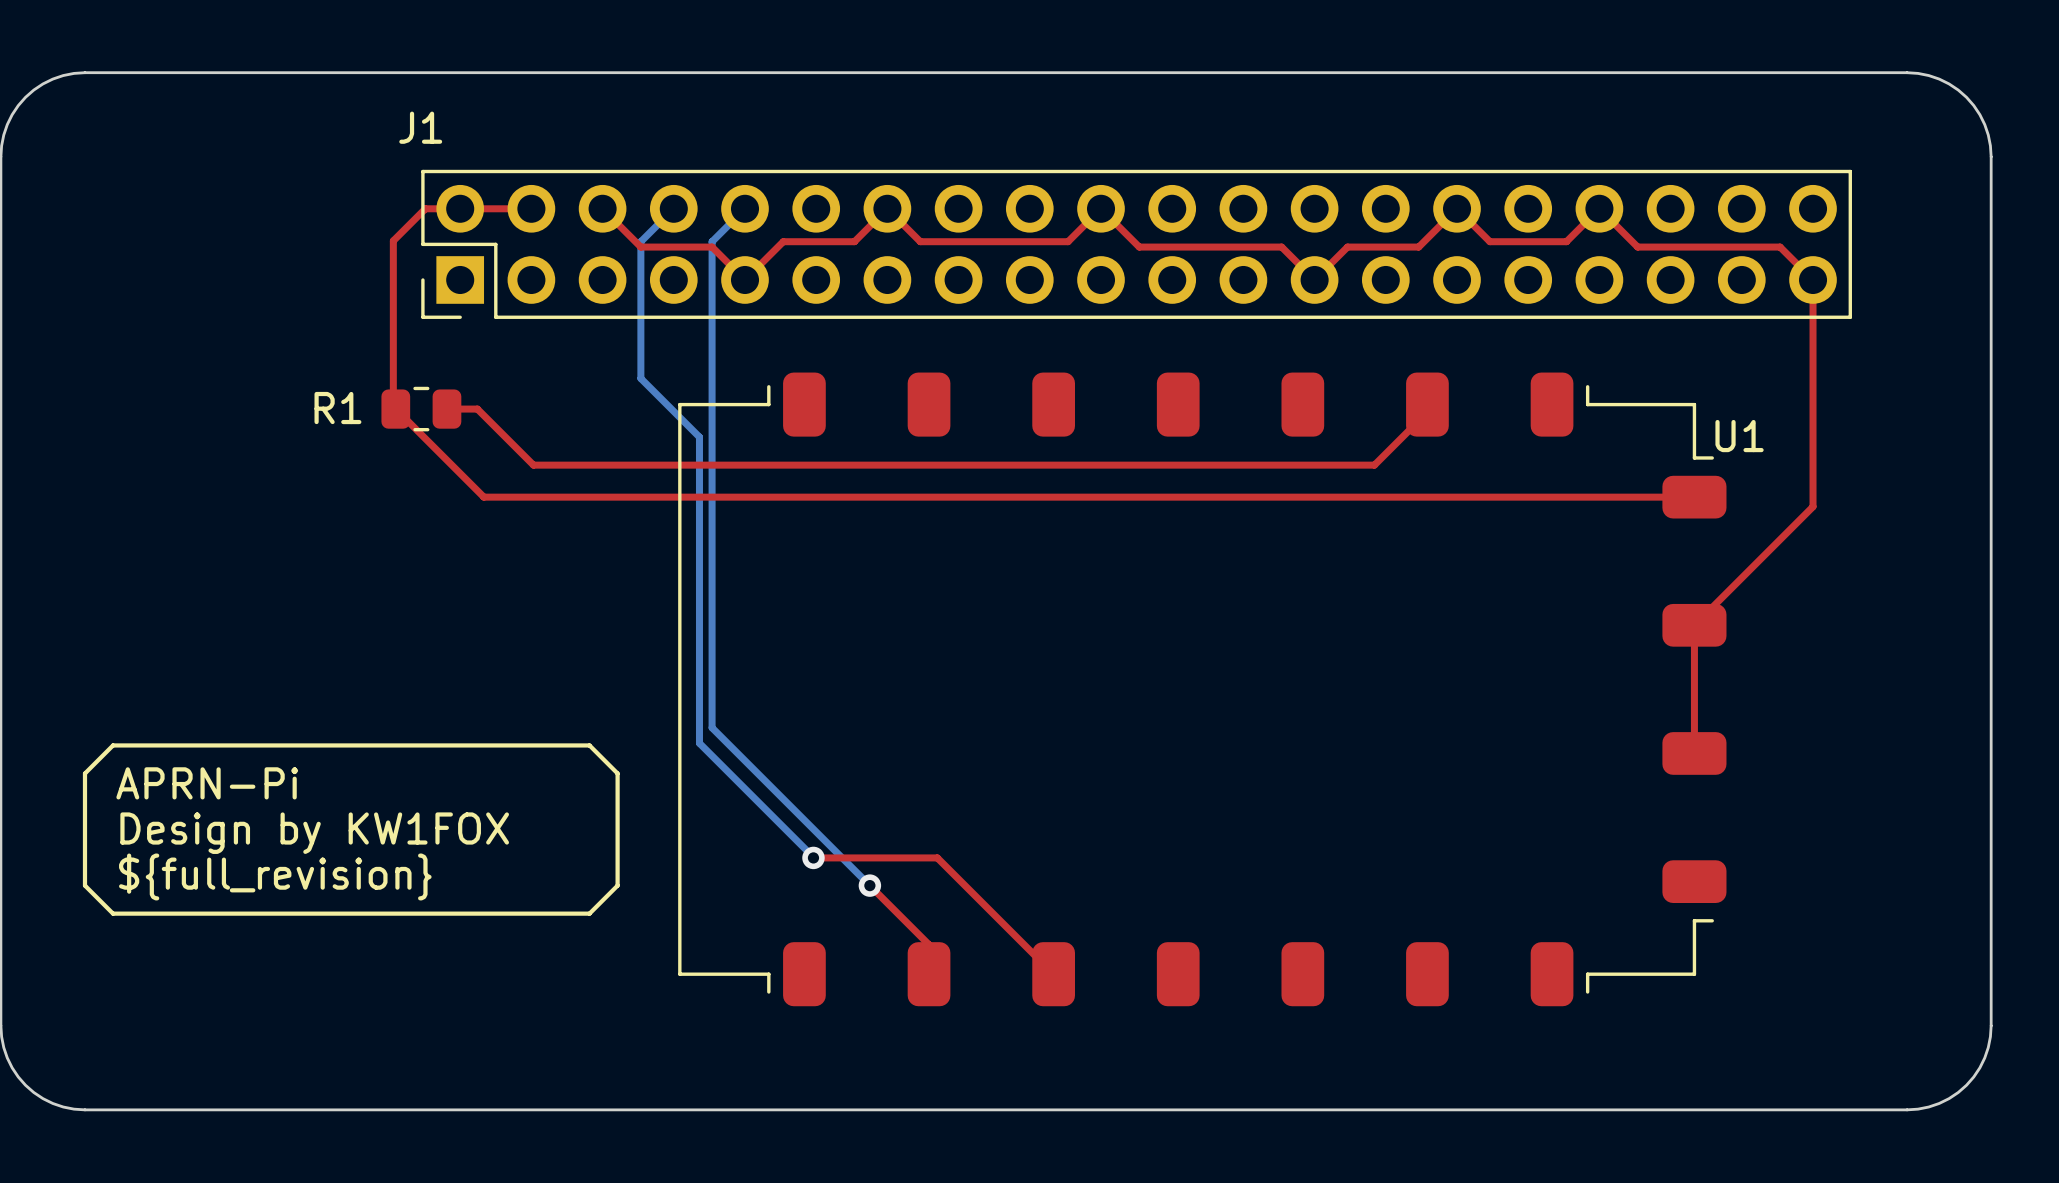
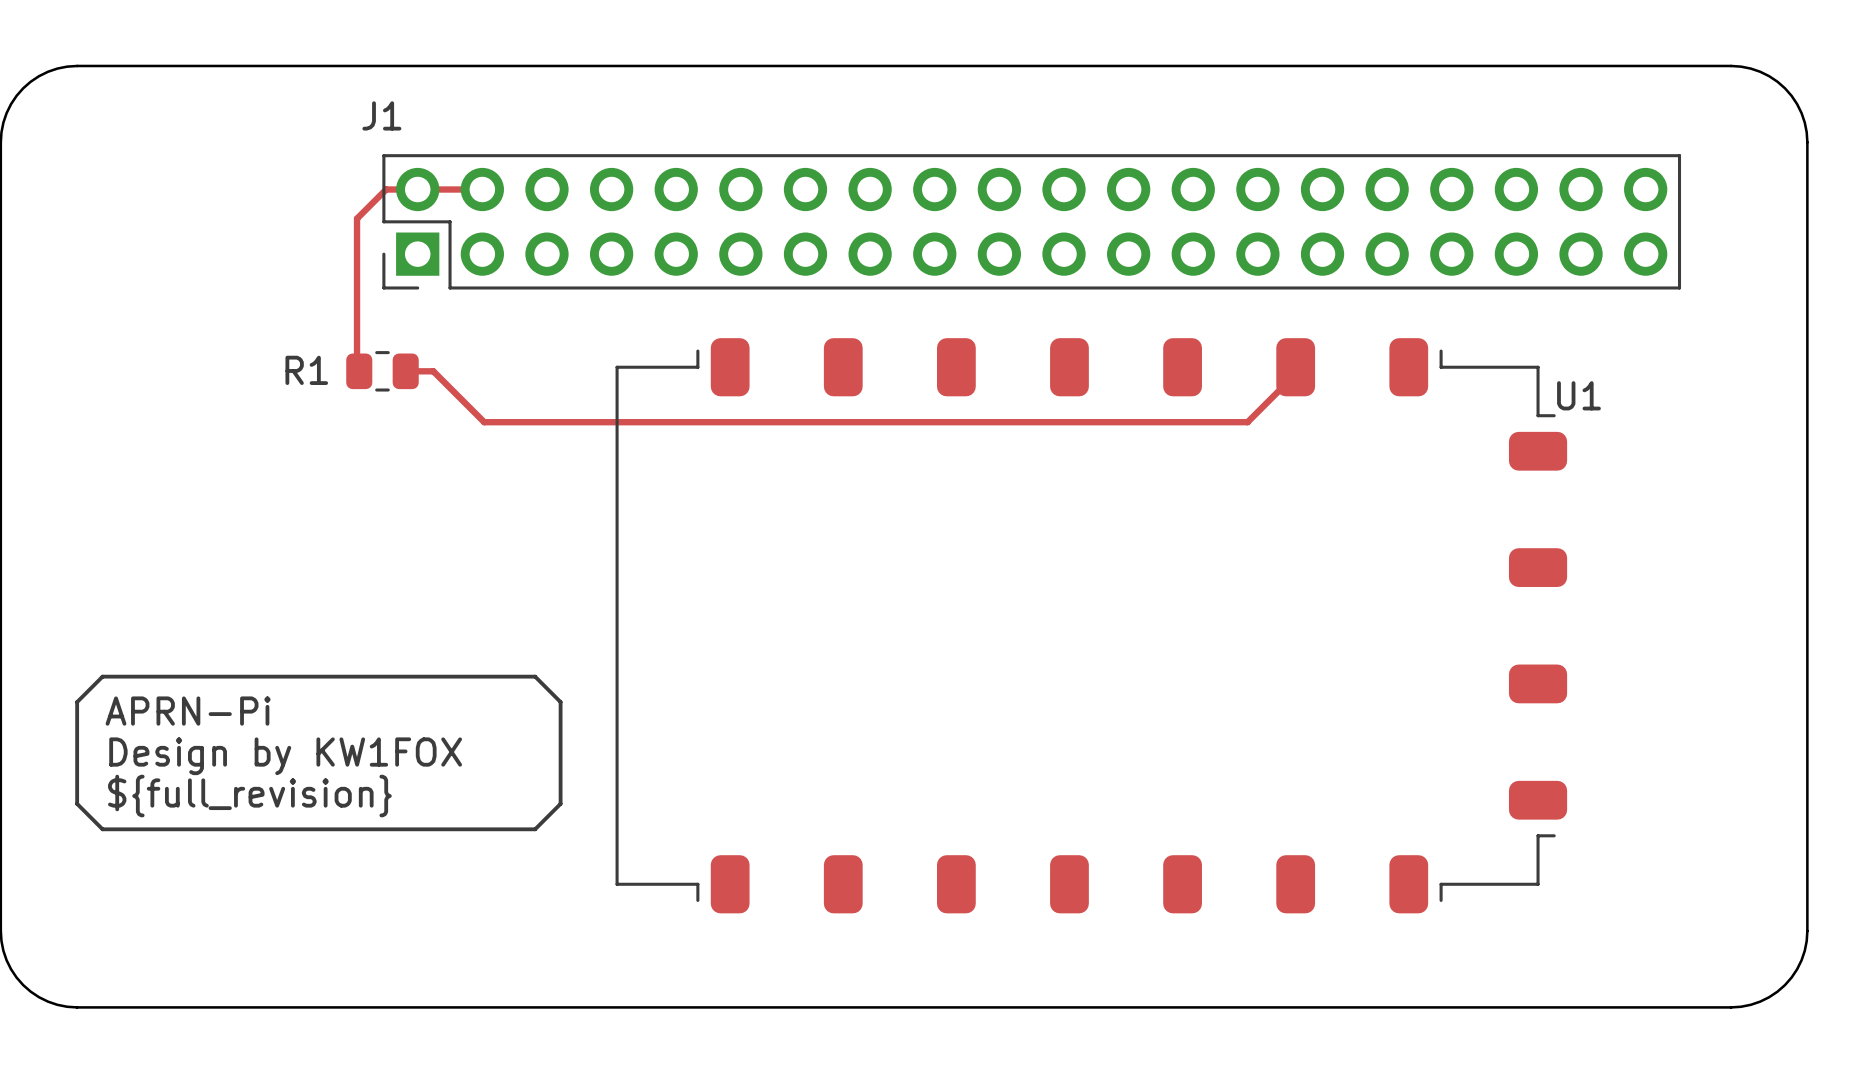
top track: (602, 208) (640, 247) (712, 247) (745, 279) (783, 241) (854, 241) (887, 208) (920, 241) (1068, 241) (1101, 208) (1139, 247) (1281, 247) (1314, 279) (1347, 247) (1418, 247) (1457, 208) (1489, 241) (1566, 241) (1599, 208) (1637, 247) (1780, 247) (1813, 279) (1813, 506) (1694, 625) (1694, 753) -> none
bottom track: (673, 208) (640, 241) (640, 378) (699, 437) (699, 743) (813, 857) -> none
bottom track: (745, 208) (712, 241) (712, 727) (869, 885) -> none
top track: (395, 409) (483, 497) (1694, 497) -> none
top track: (813, 857) (937, 857) (1053, 974) -> none
via: (813, 857) -> none
top track: (869, 885) (929, 944) (929, 974) -> none
via: (869, 885) -> none

